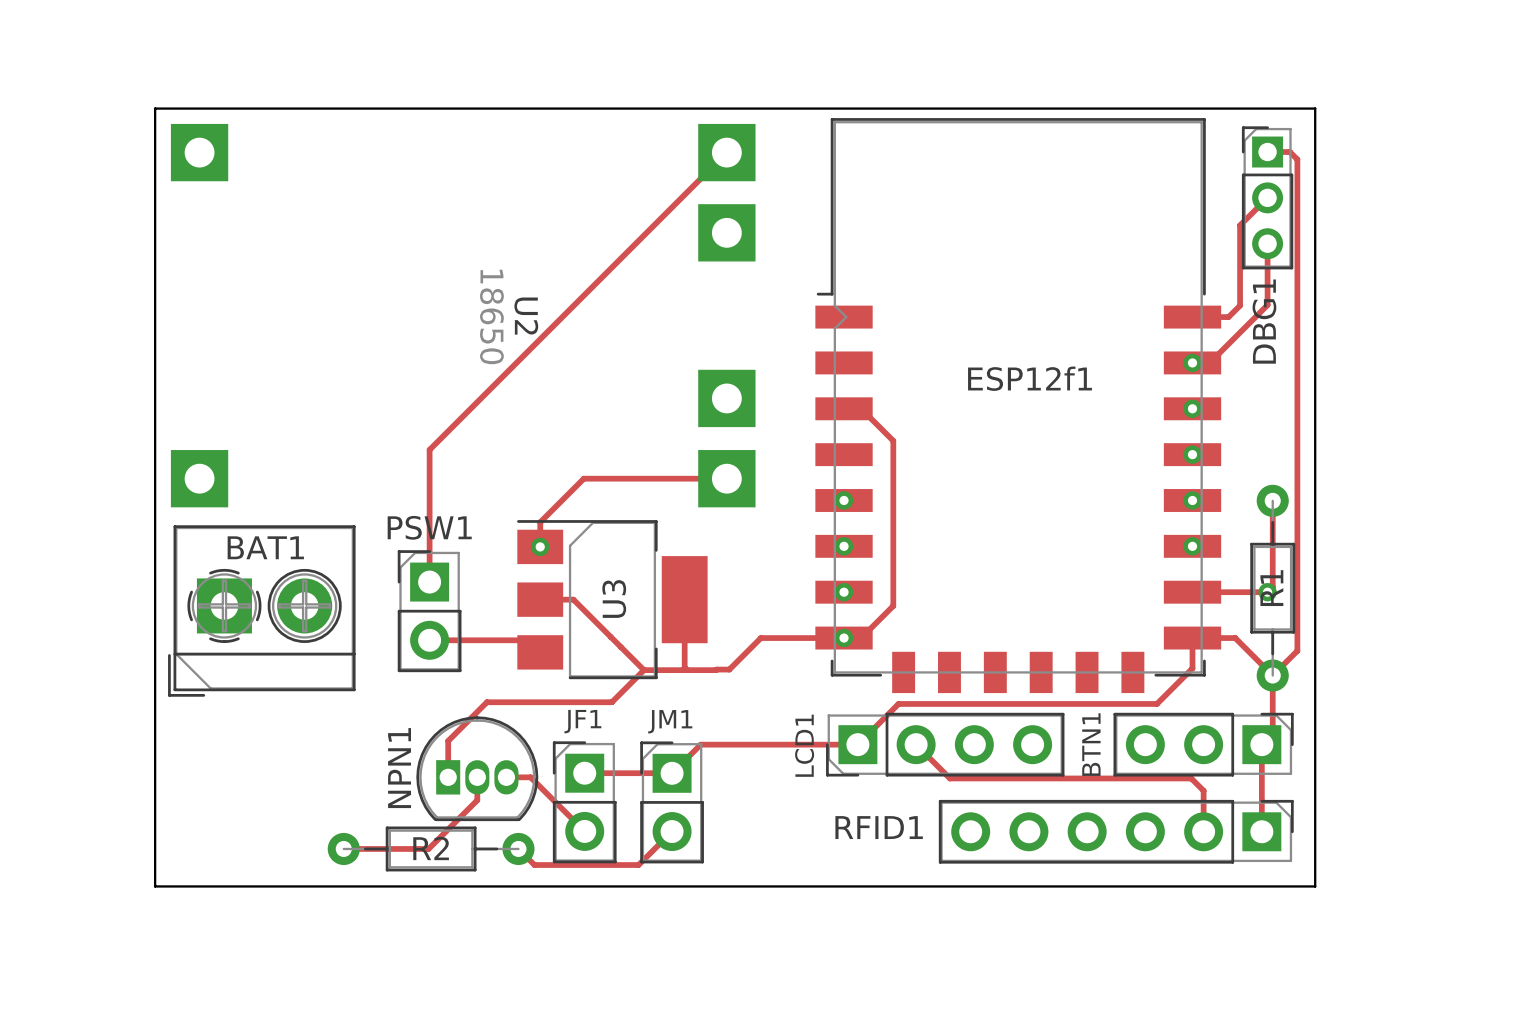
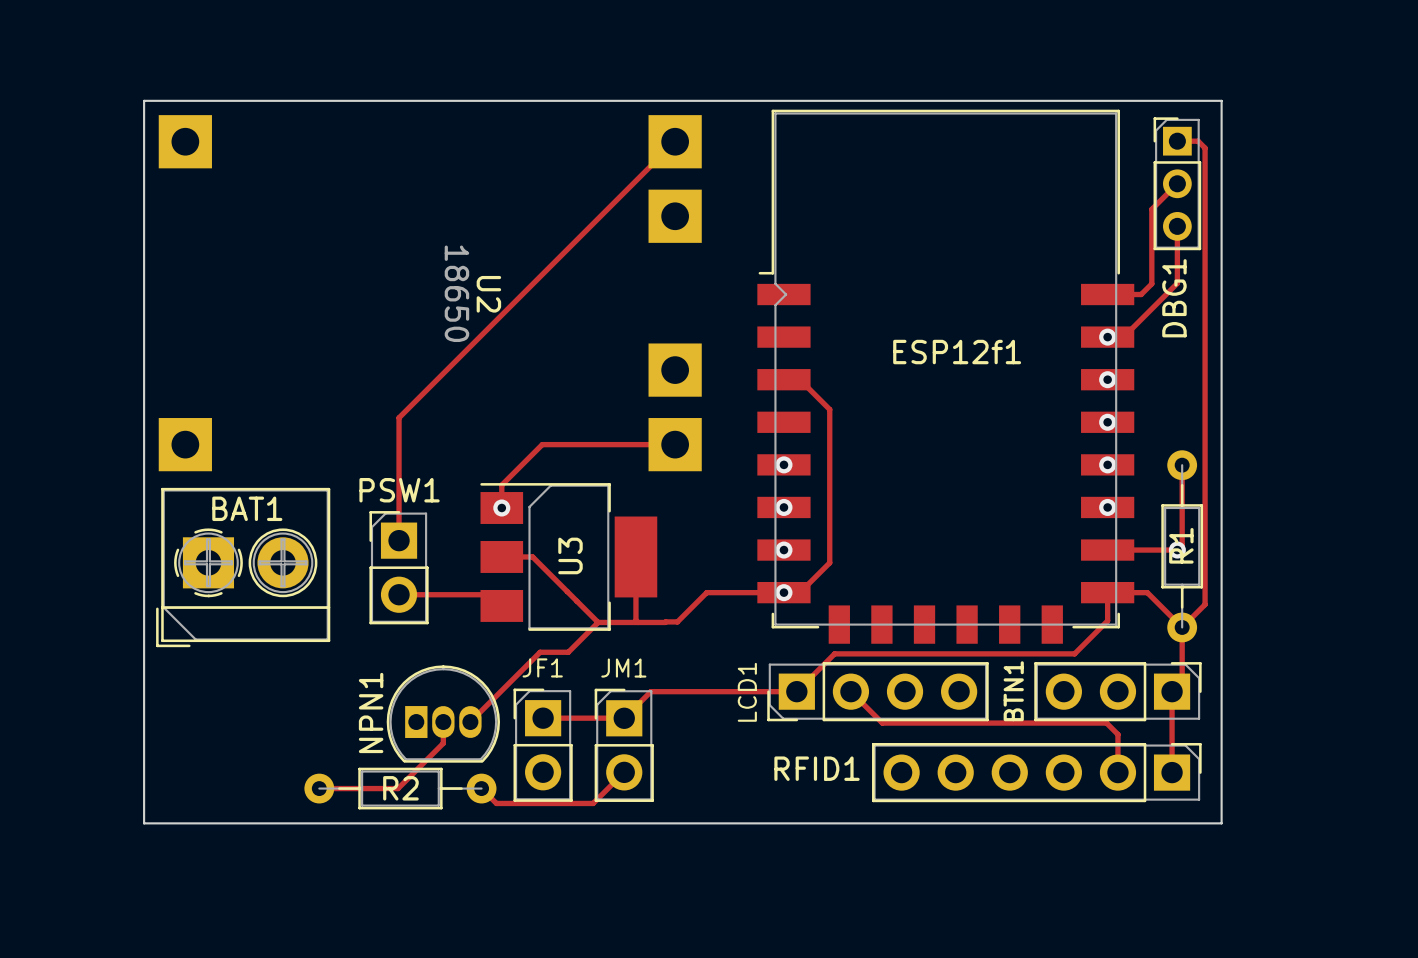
track: (581, 702) (486, 702) (448, 740) (448, 777) -> (540, 652) (470, 722)
track: (506, 777) (530, 777) (584, 831) -> none

